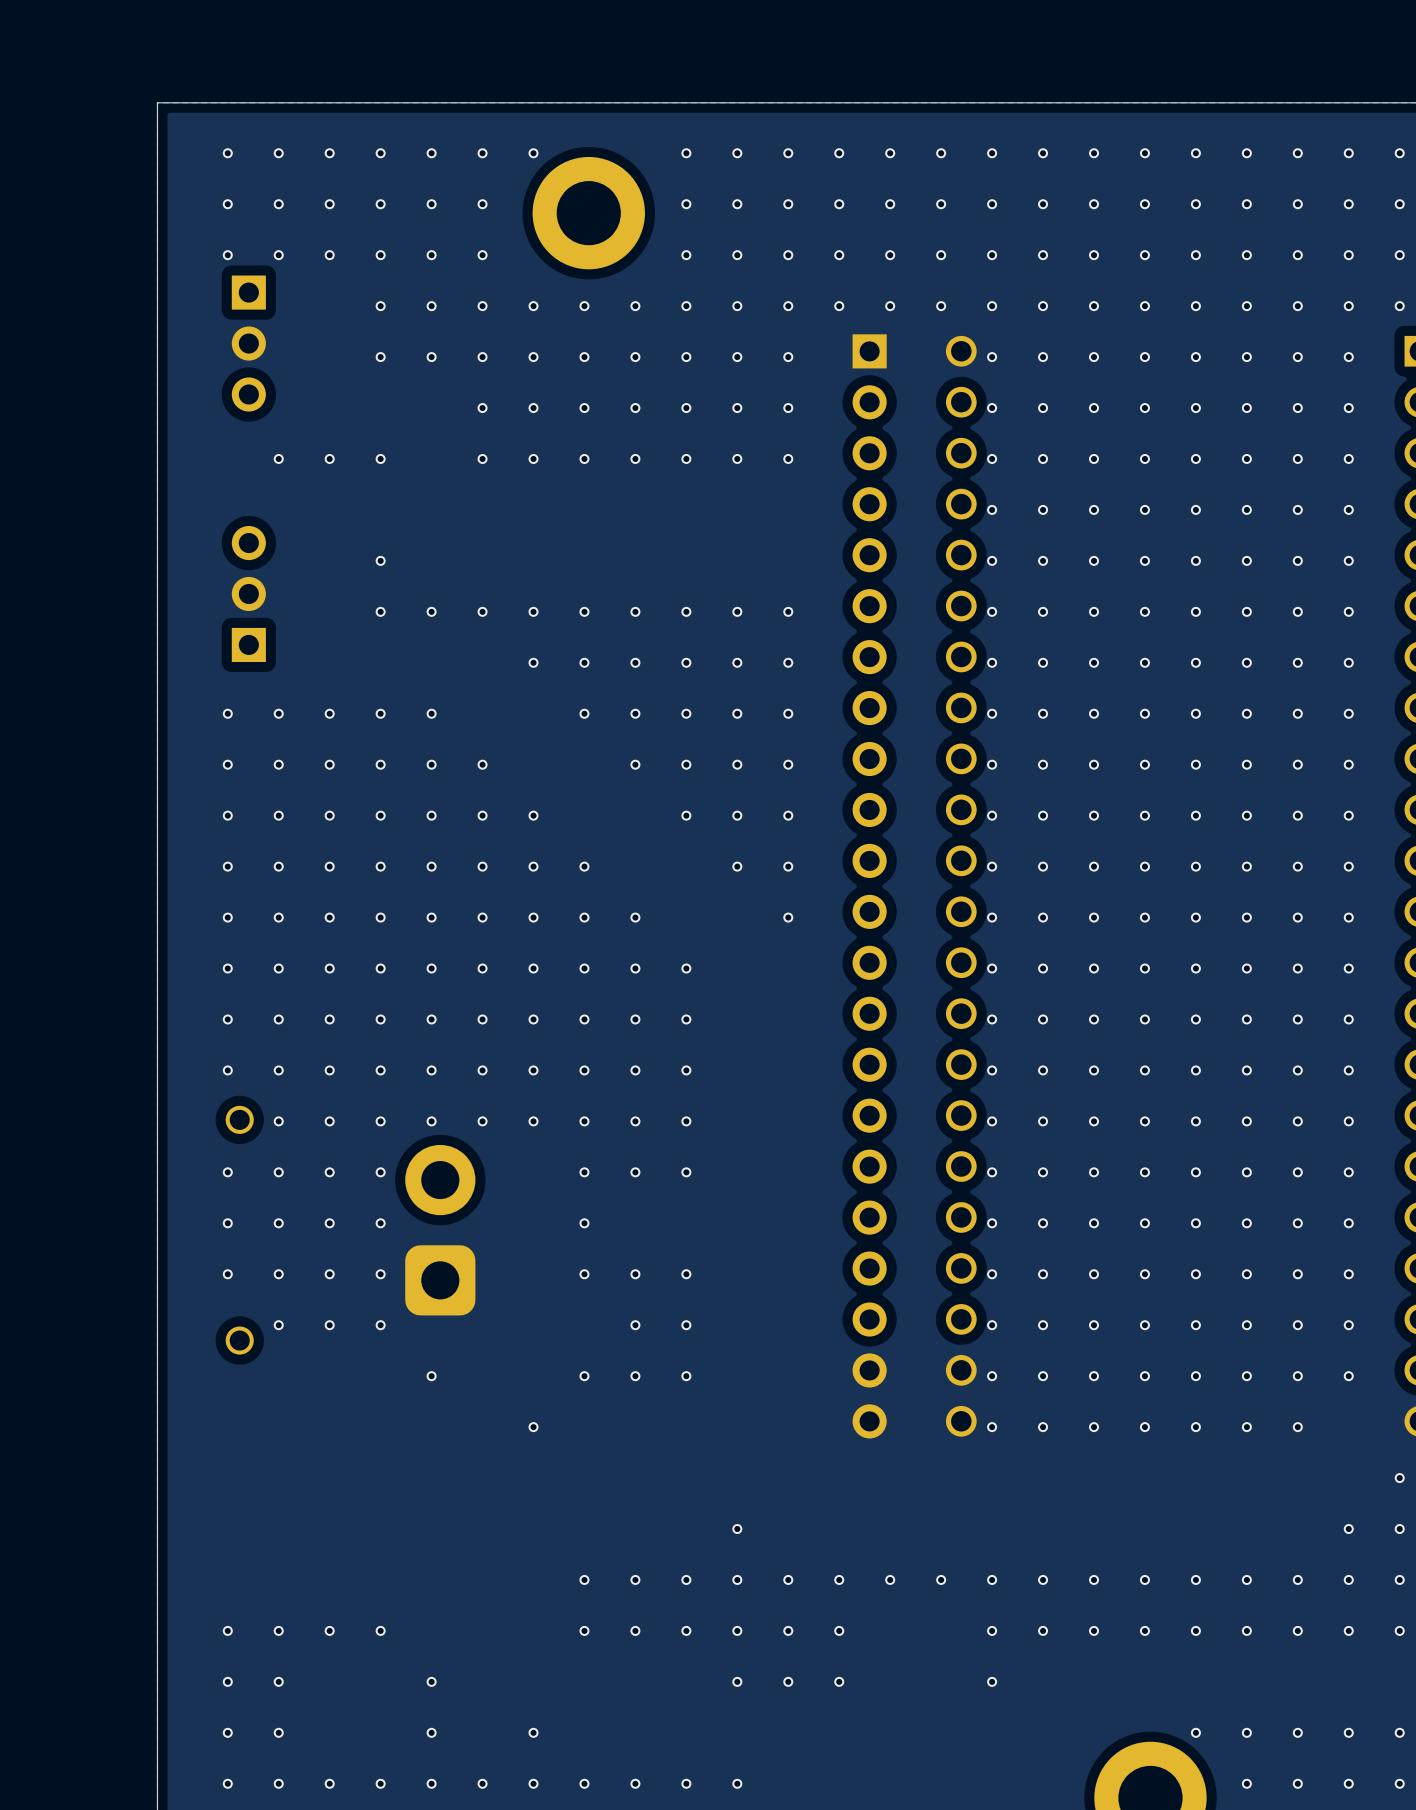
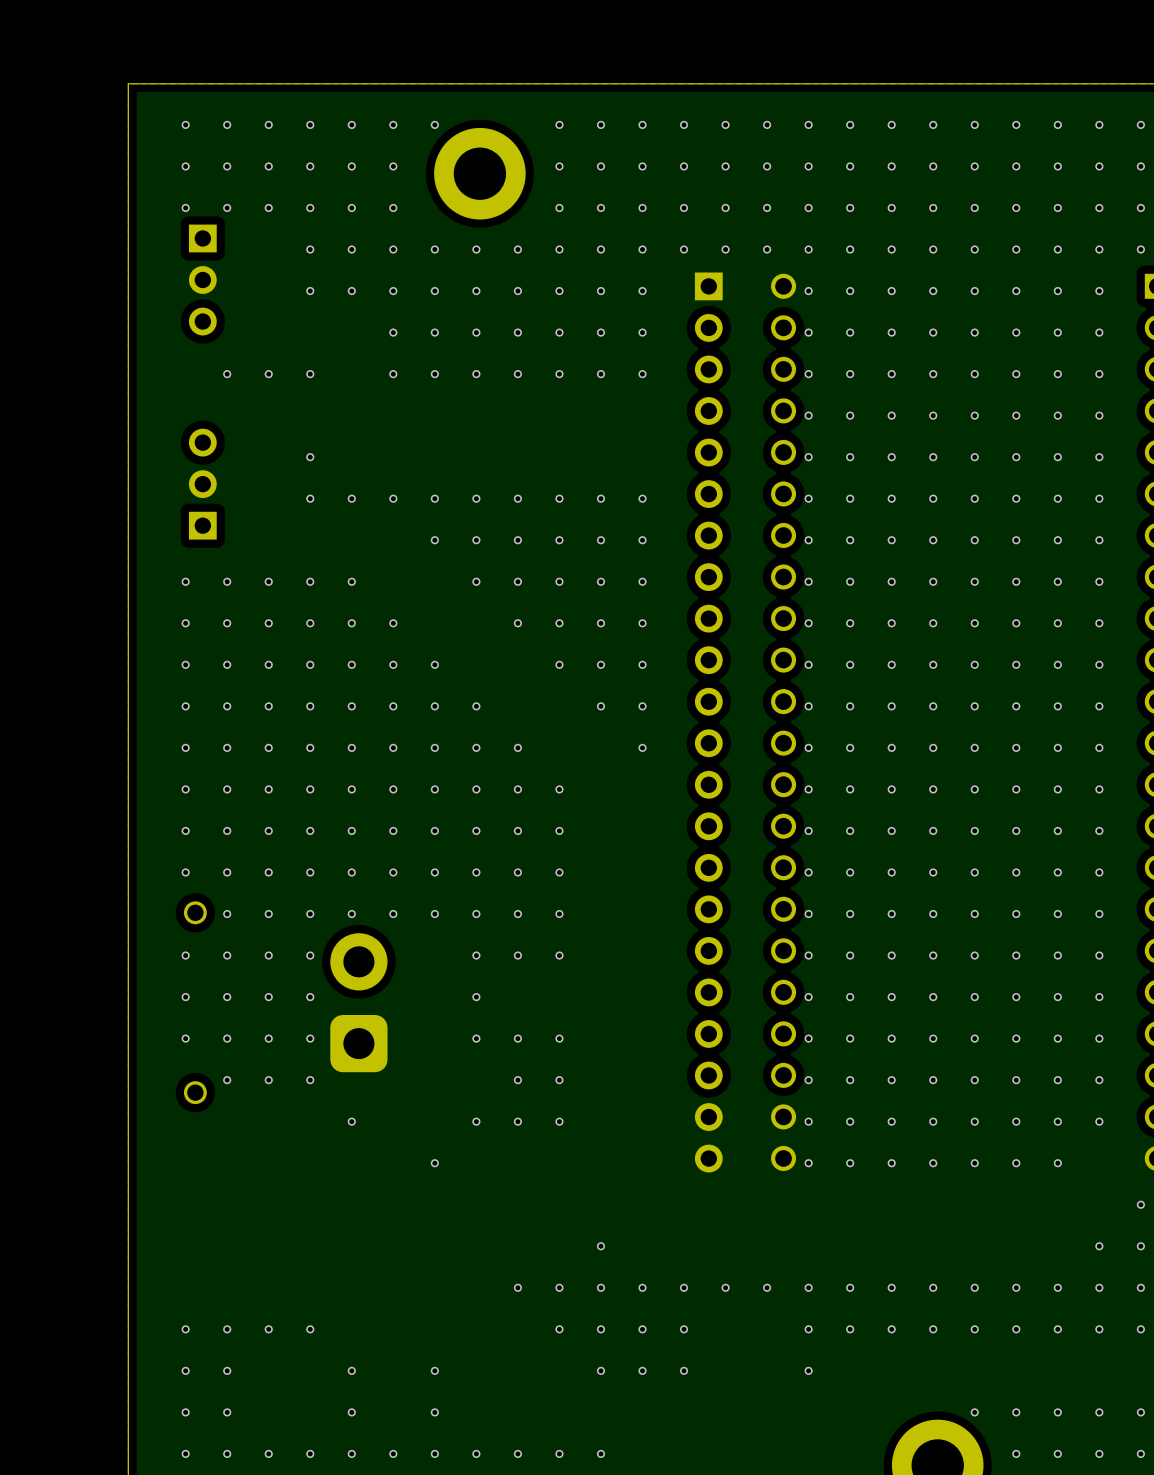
via: (584, 1579) -> none
via: (584, 1630) -> none
via: (635, 1630) -> none
via: none -> (434, 1370)

